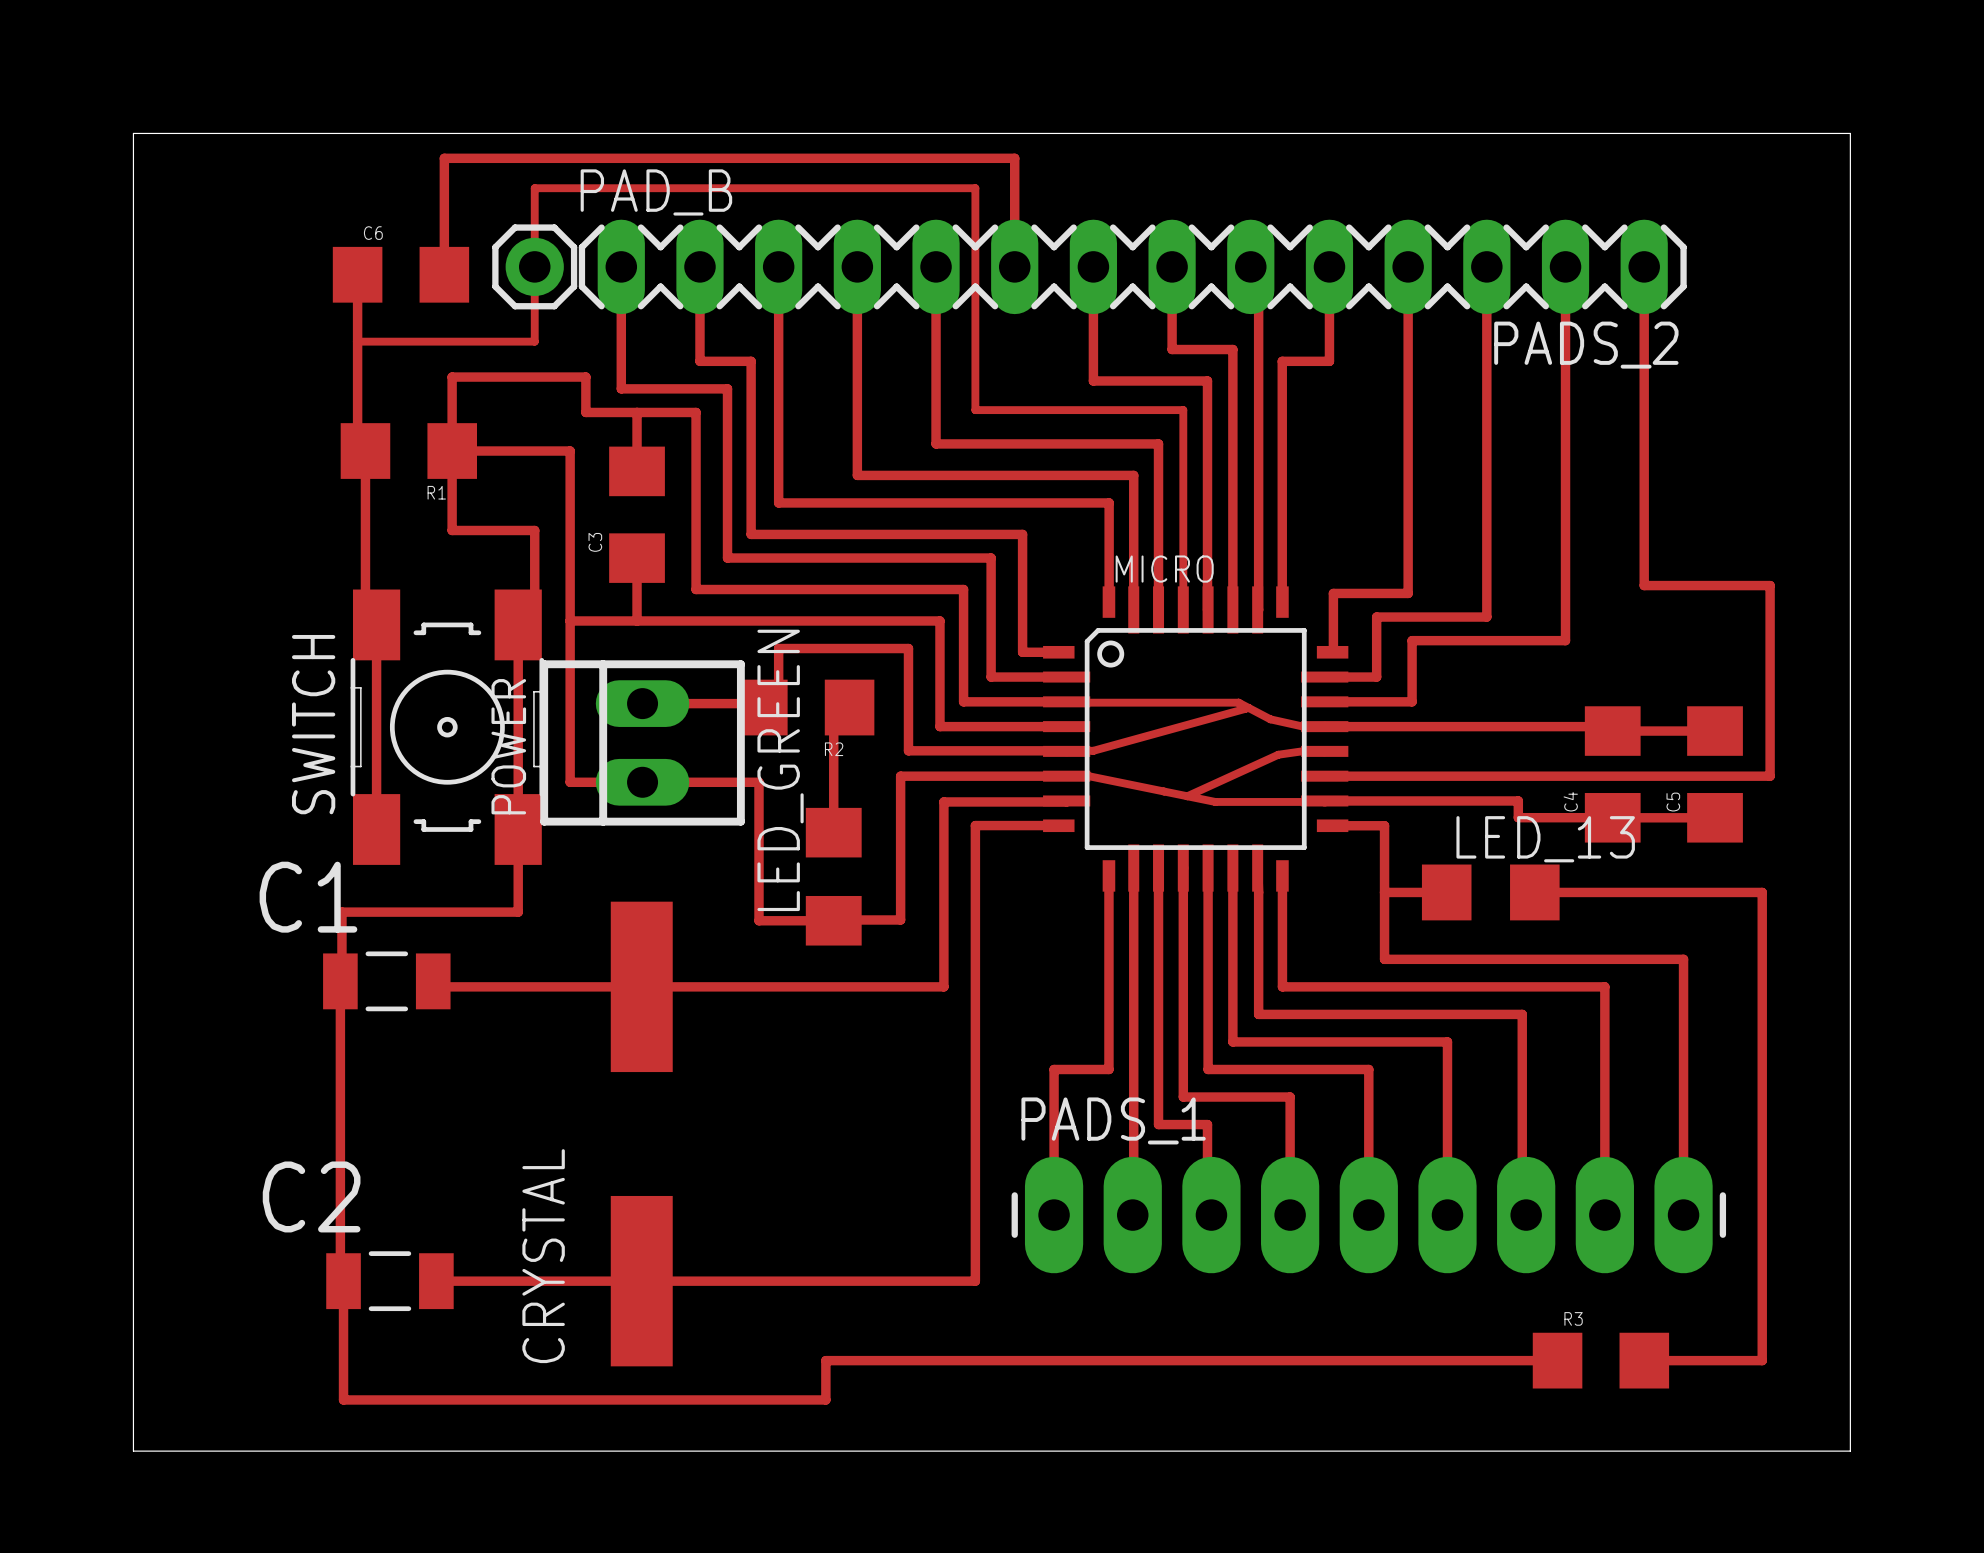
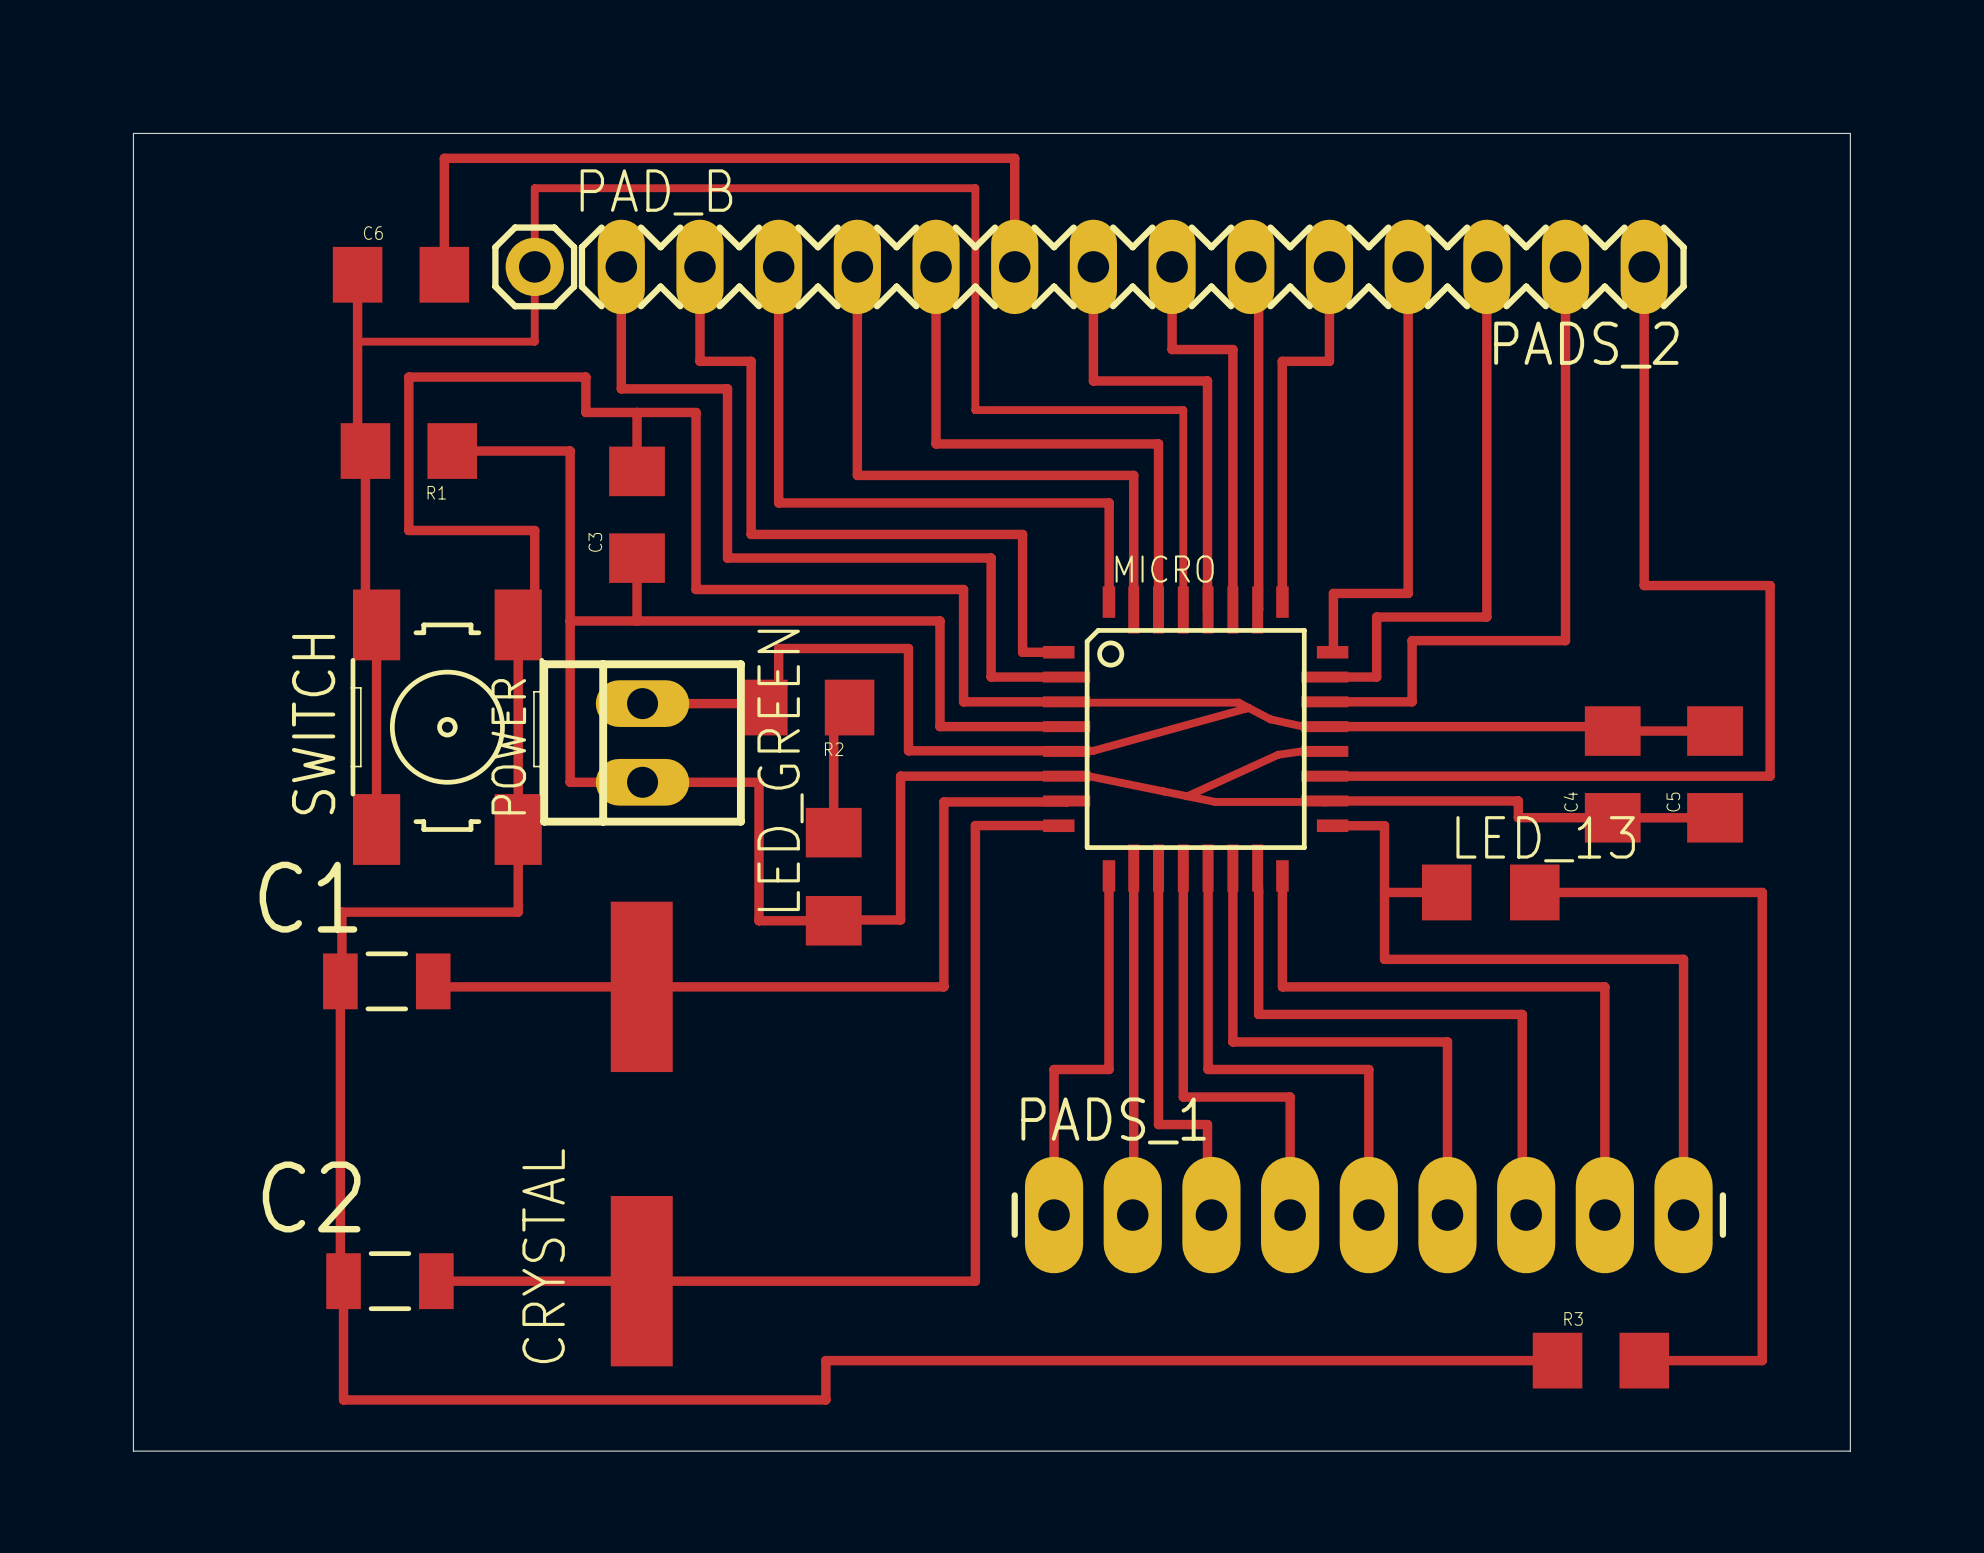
top track: (452, 377) (452, 530) -> (452, 377) (408, 377) (408, 530) (452, 530)

